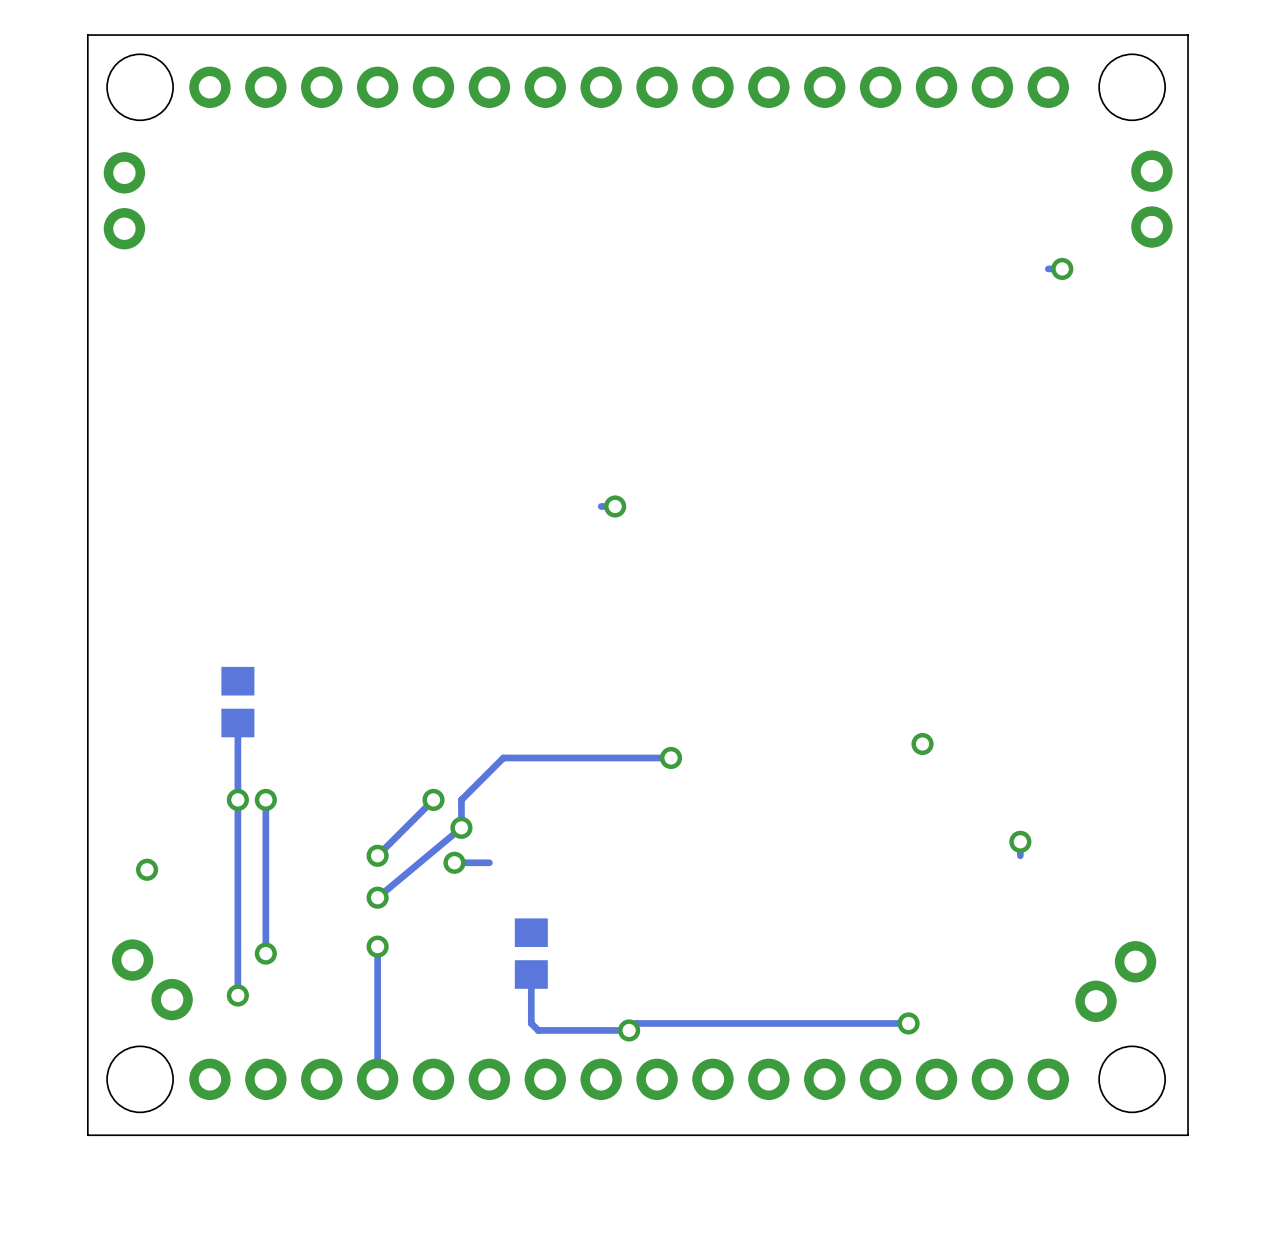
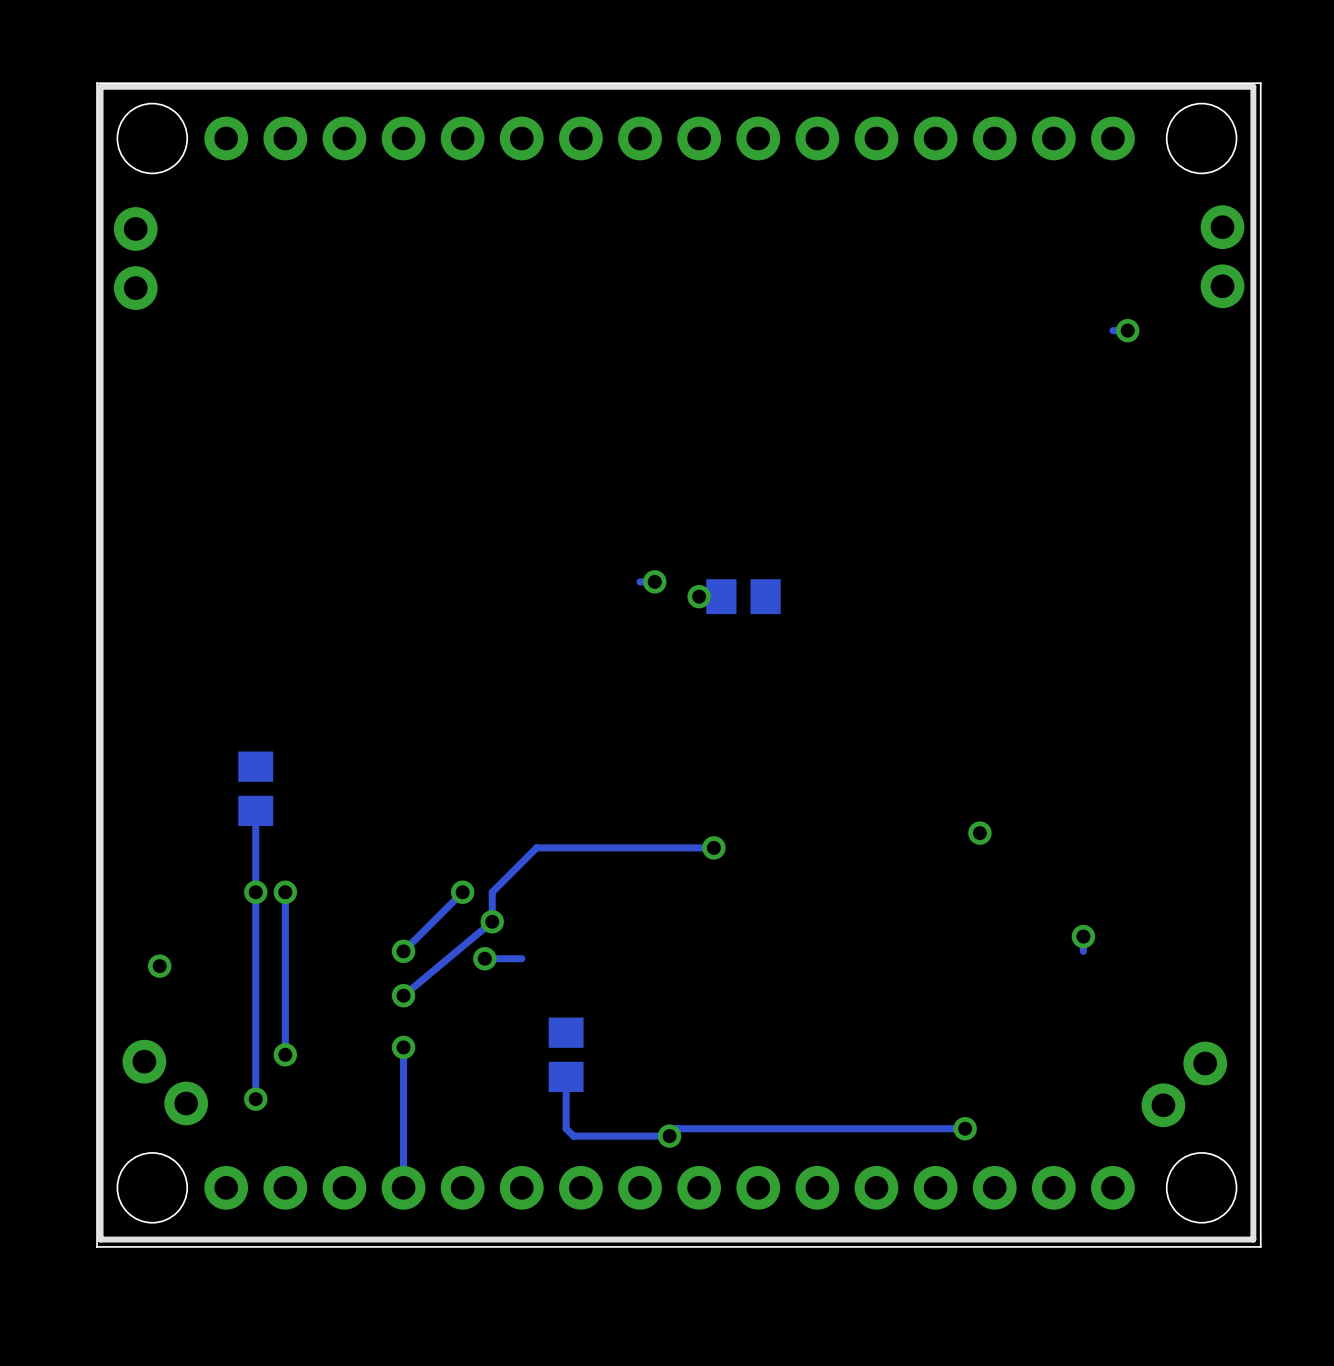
line: none -> (1253, 86) (1253, 1239) (100, 1239) (100, 86) (1253, 86)
via: none -> (699, 596)
part: none -> (743, 596)

